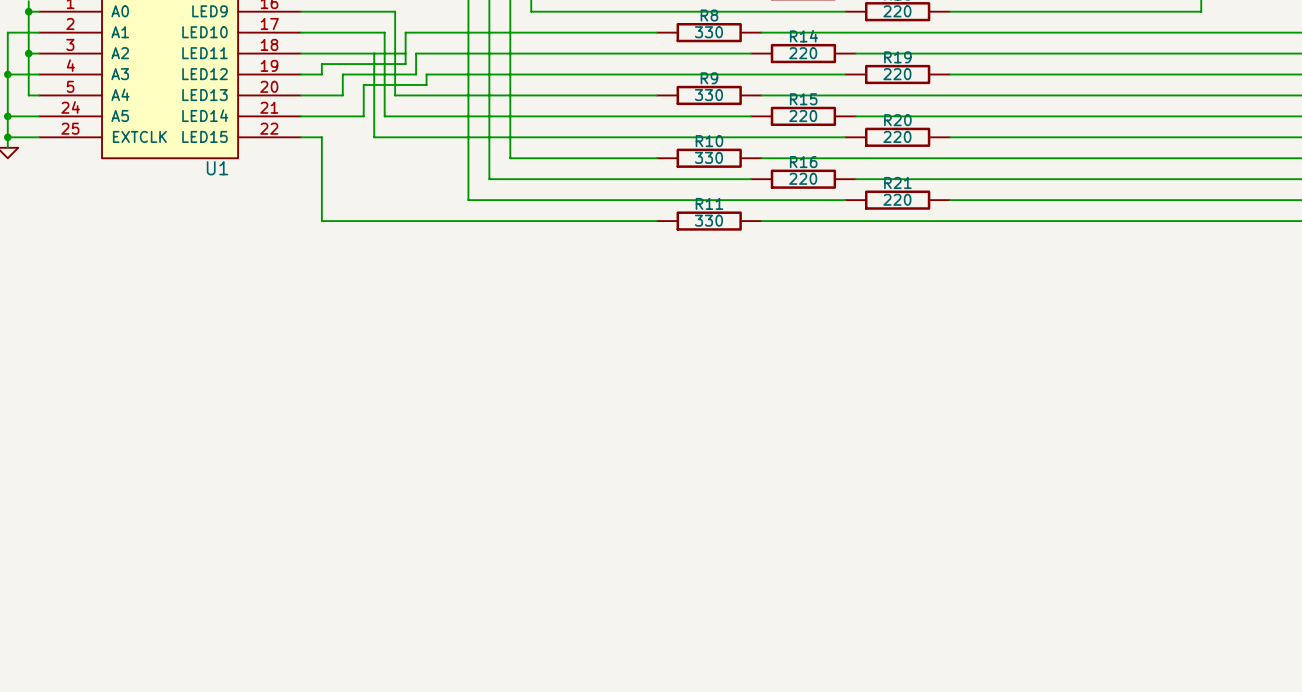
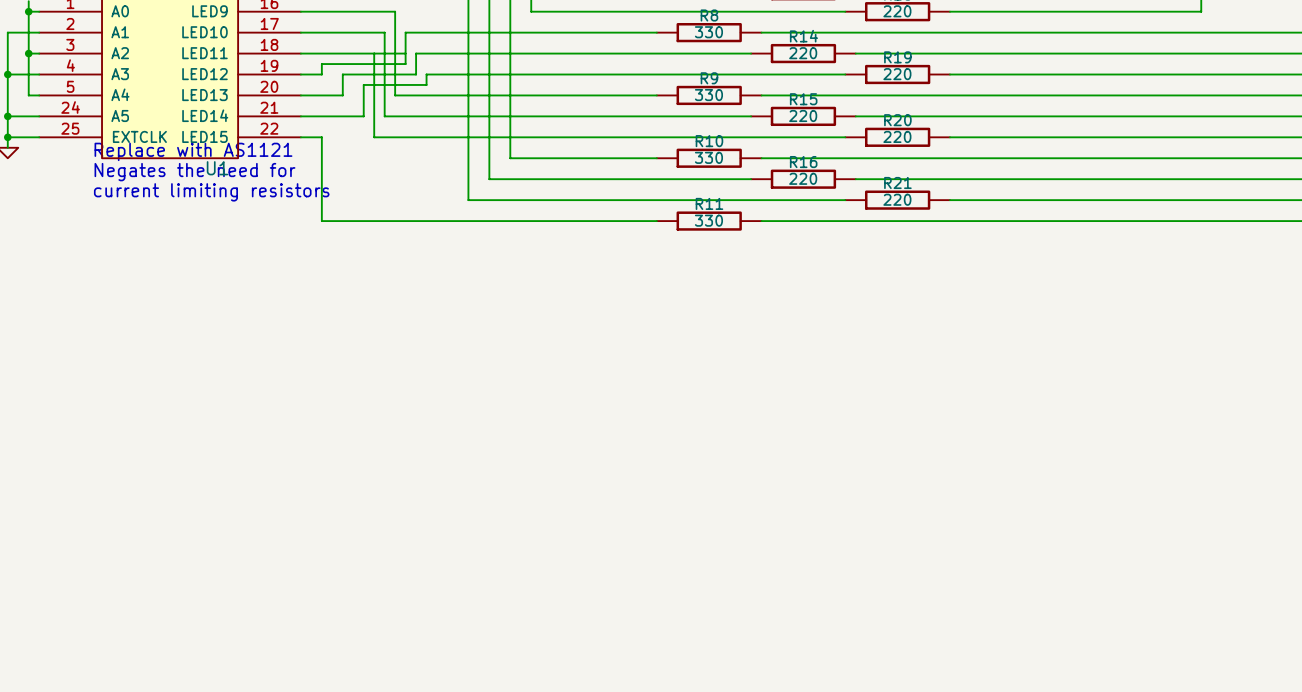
text: none -> Replace with AS1121 (193, 151)
text: none -> Negates the need for (194, 172)
text: none -> current limiting resistors (211, 192)

